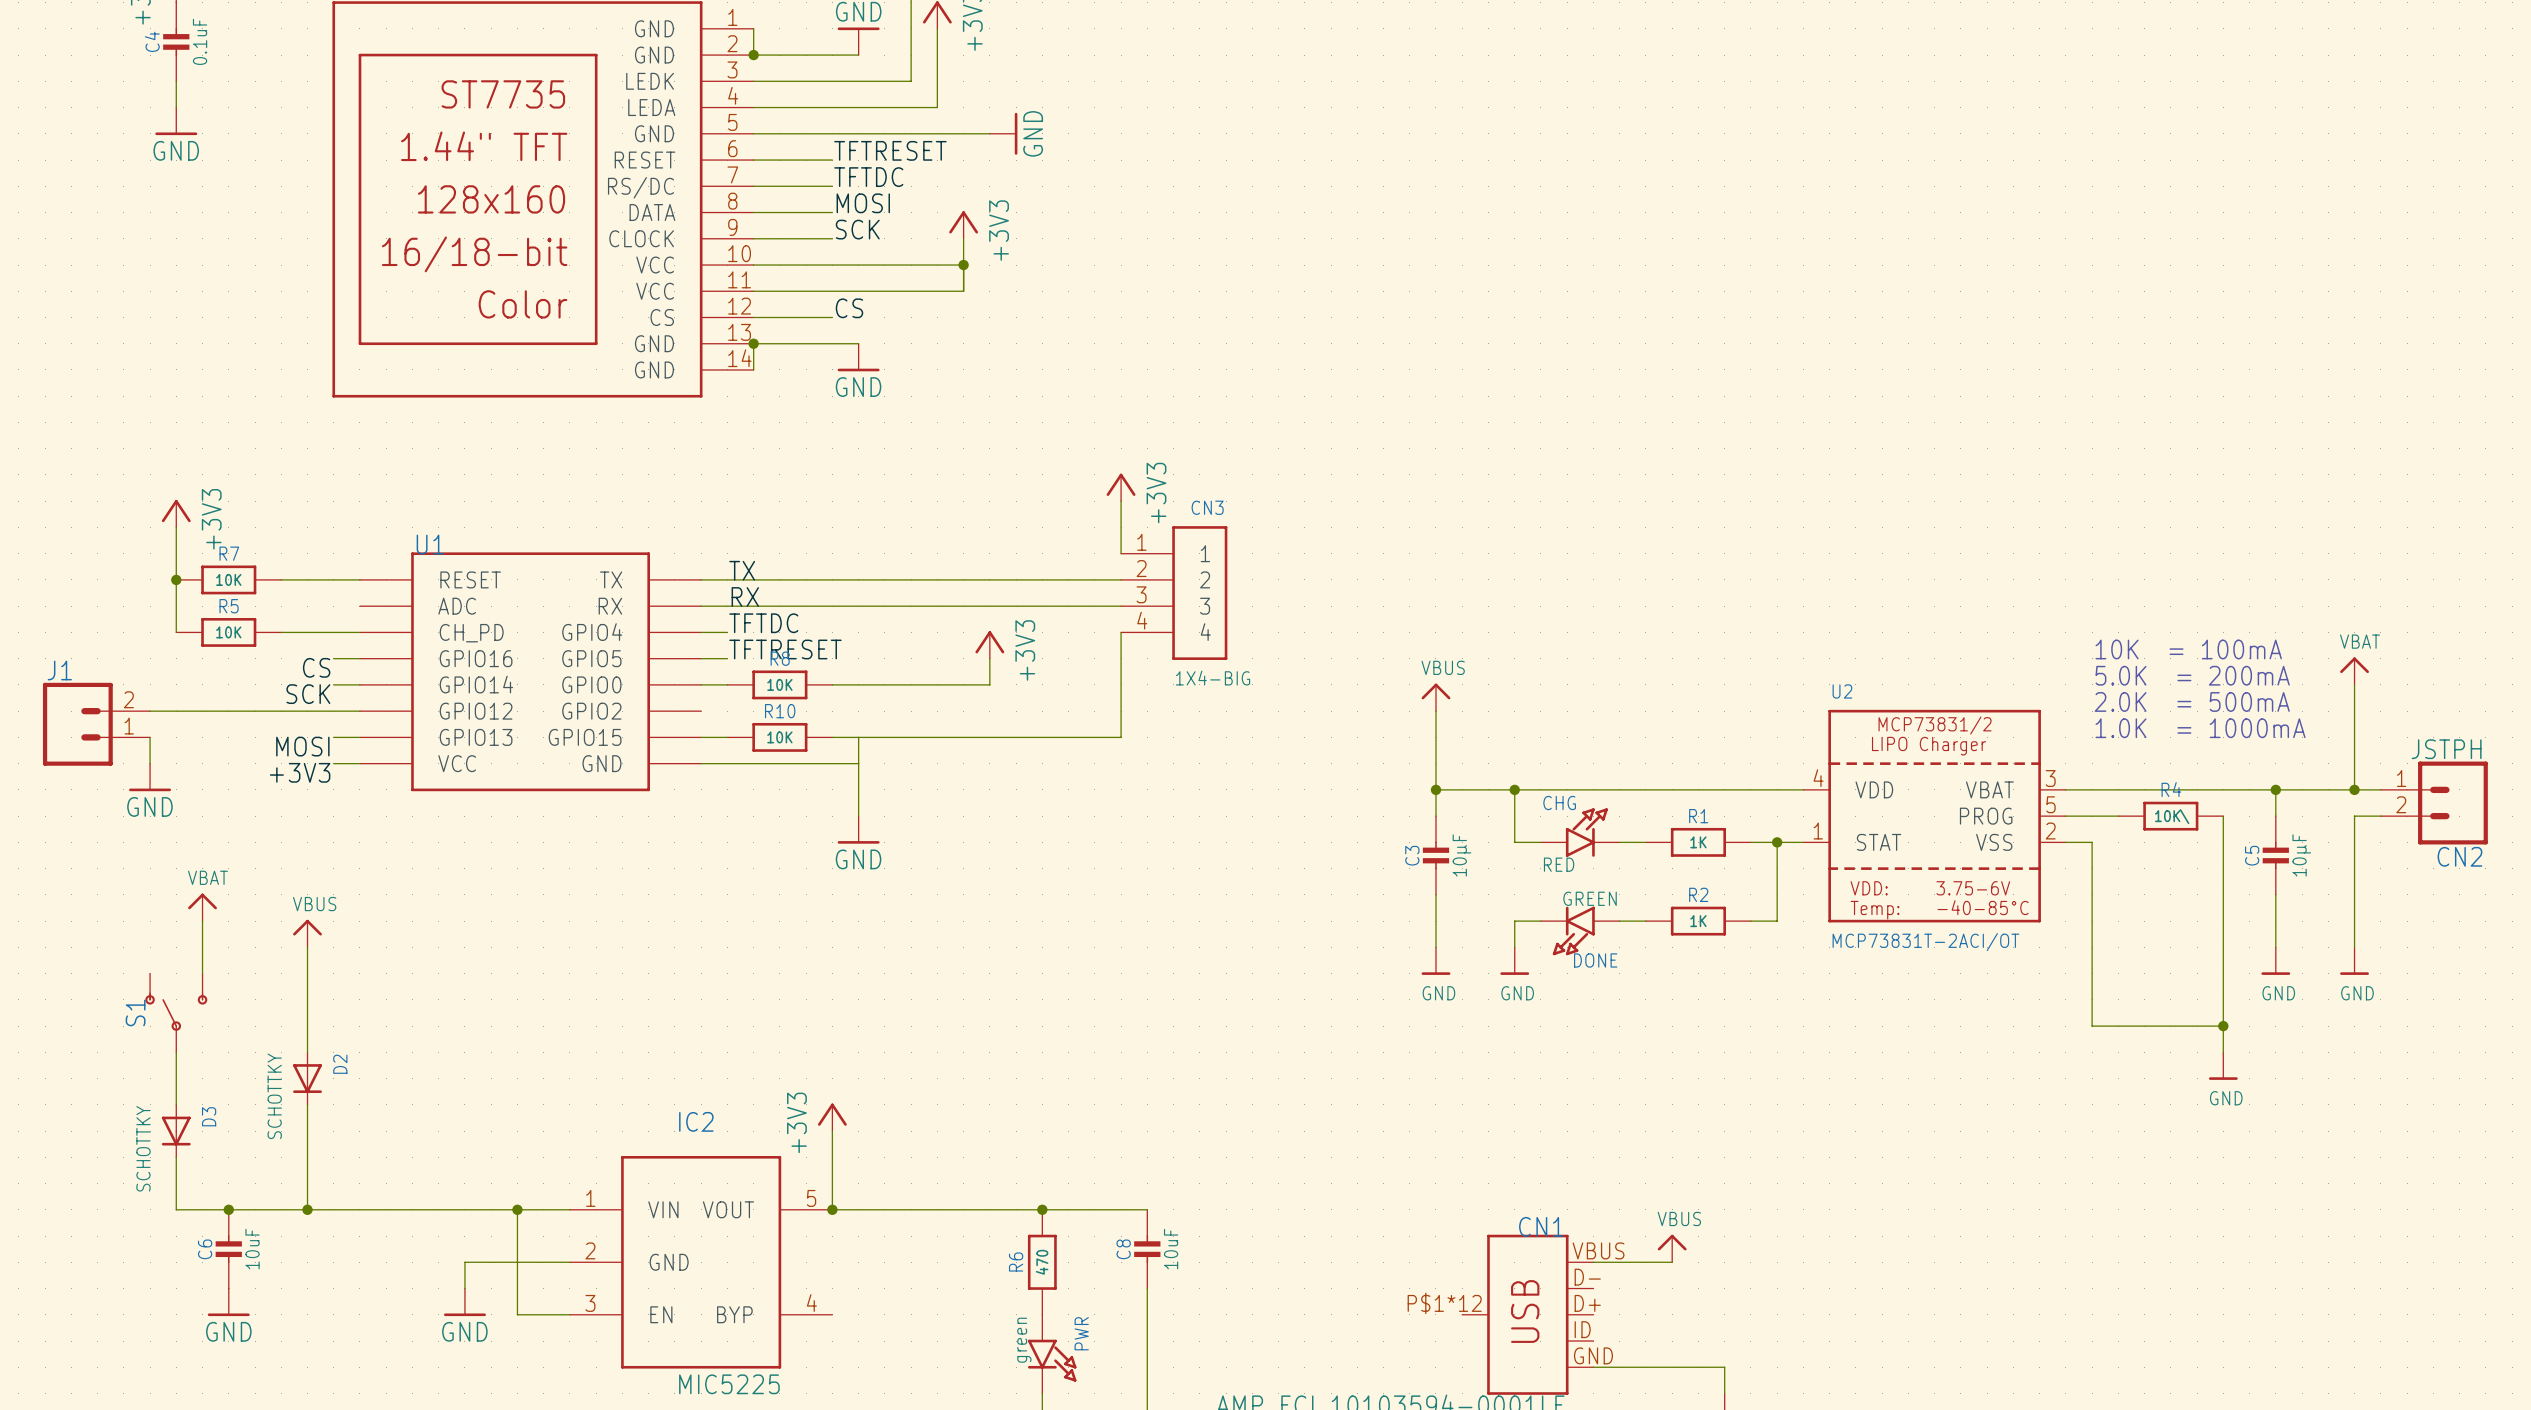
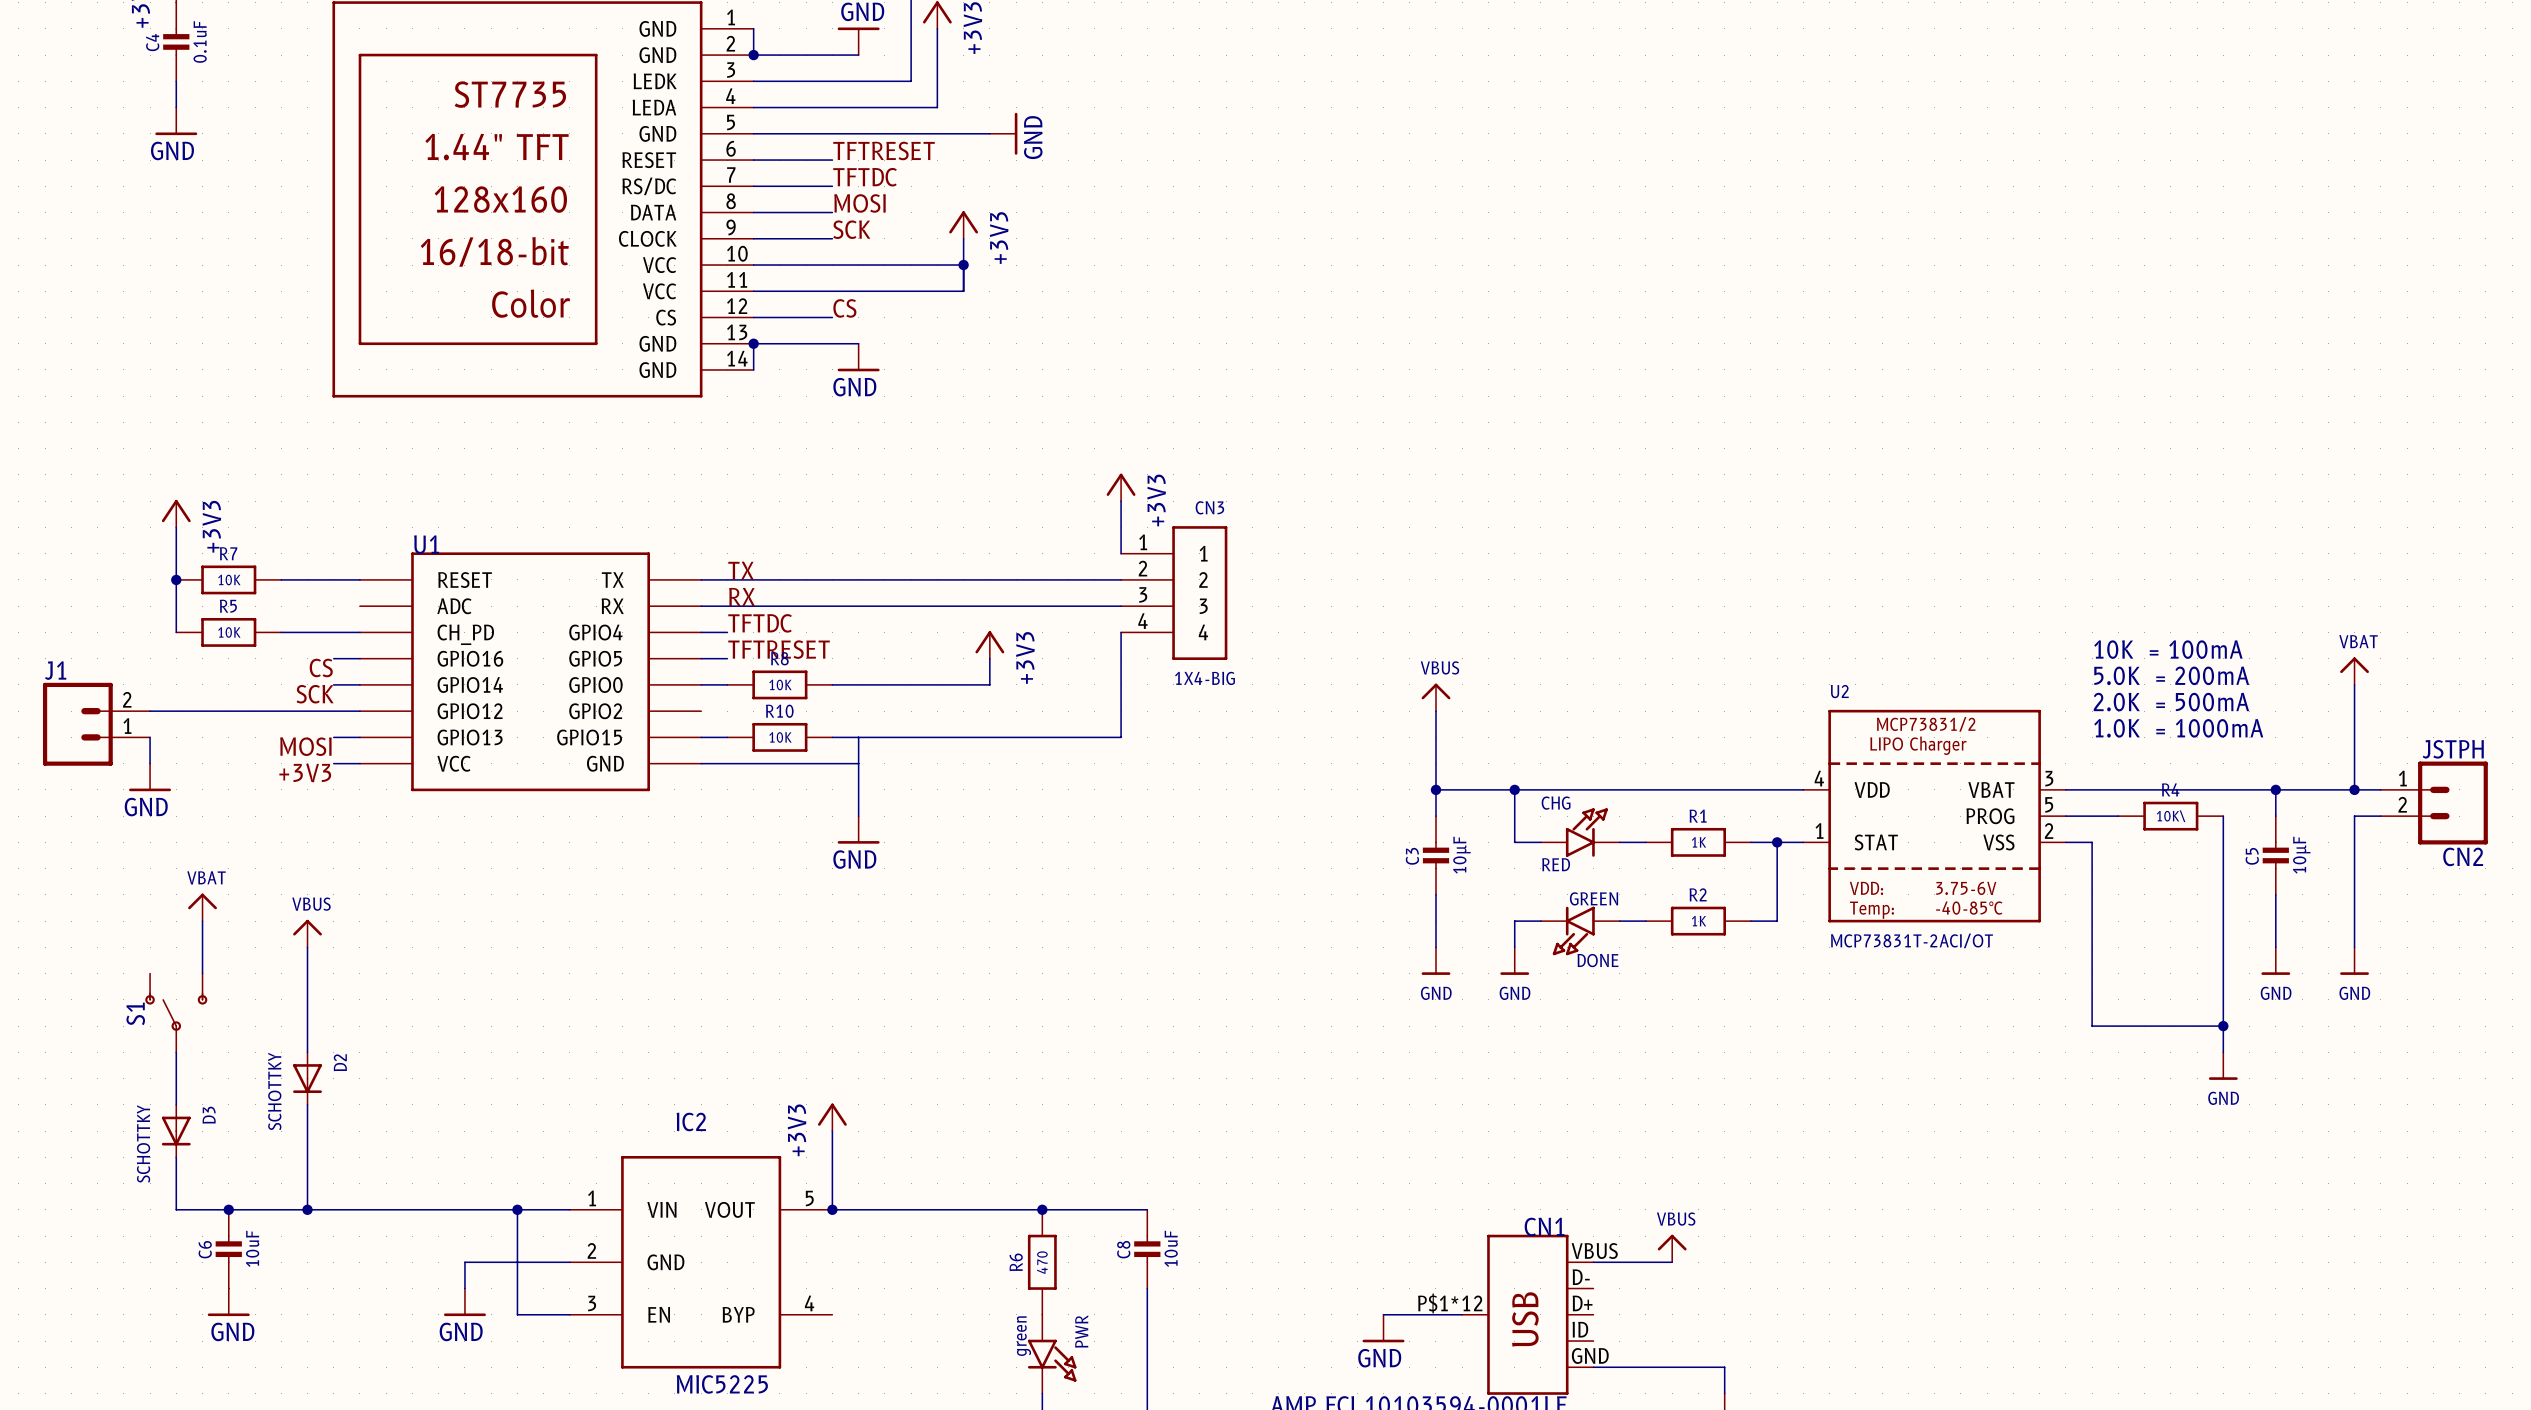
wire: none -> (1383, 1314) (1462, 1314)
power symbol: none -> GND (1383, 1328)

